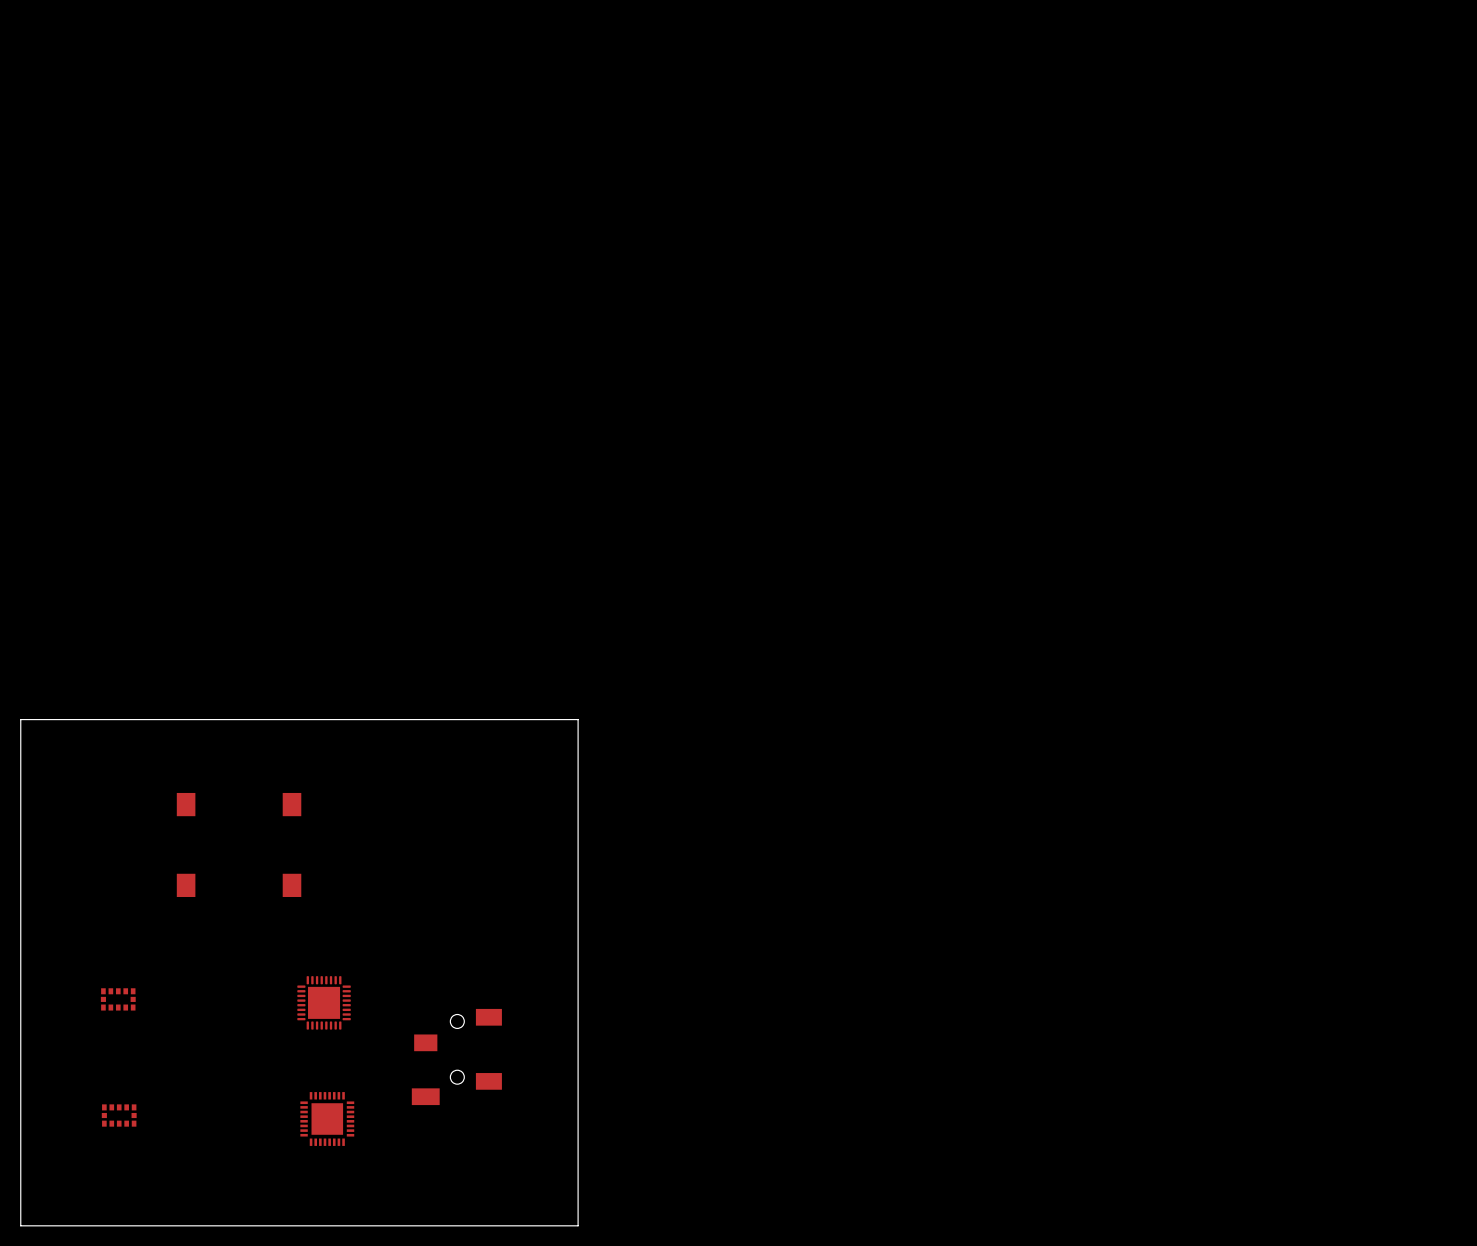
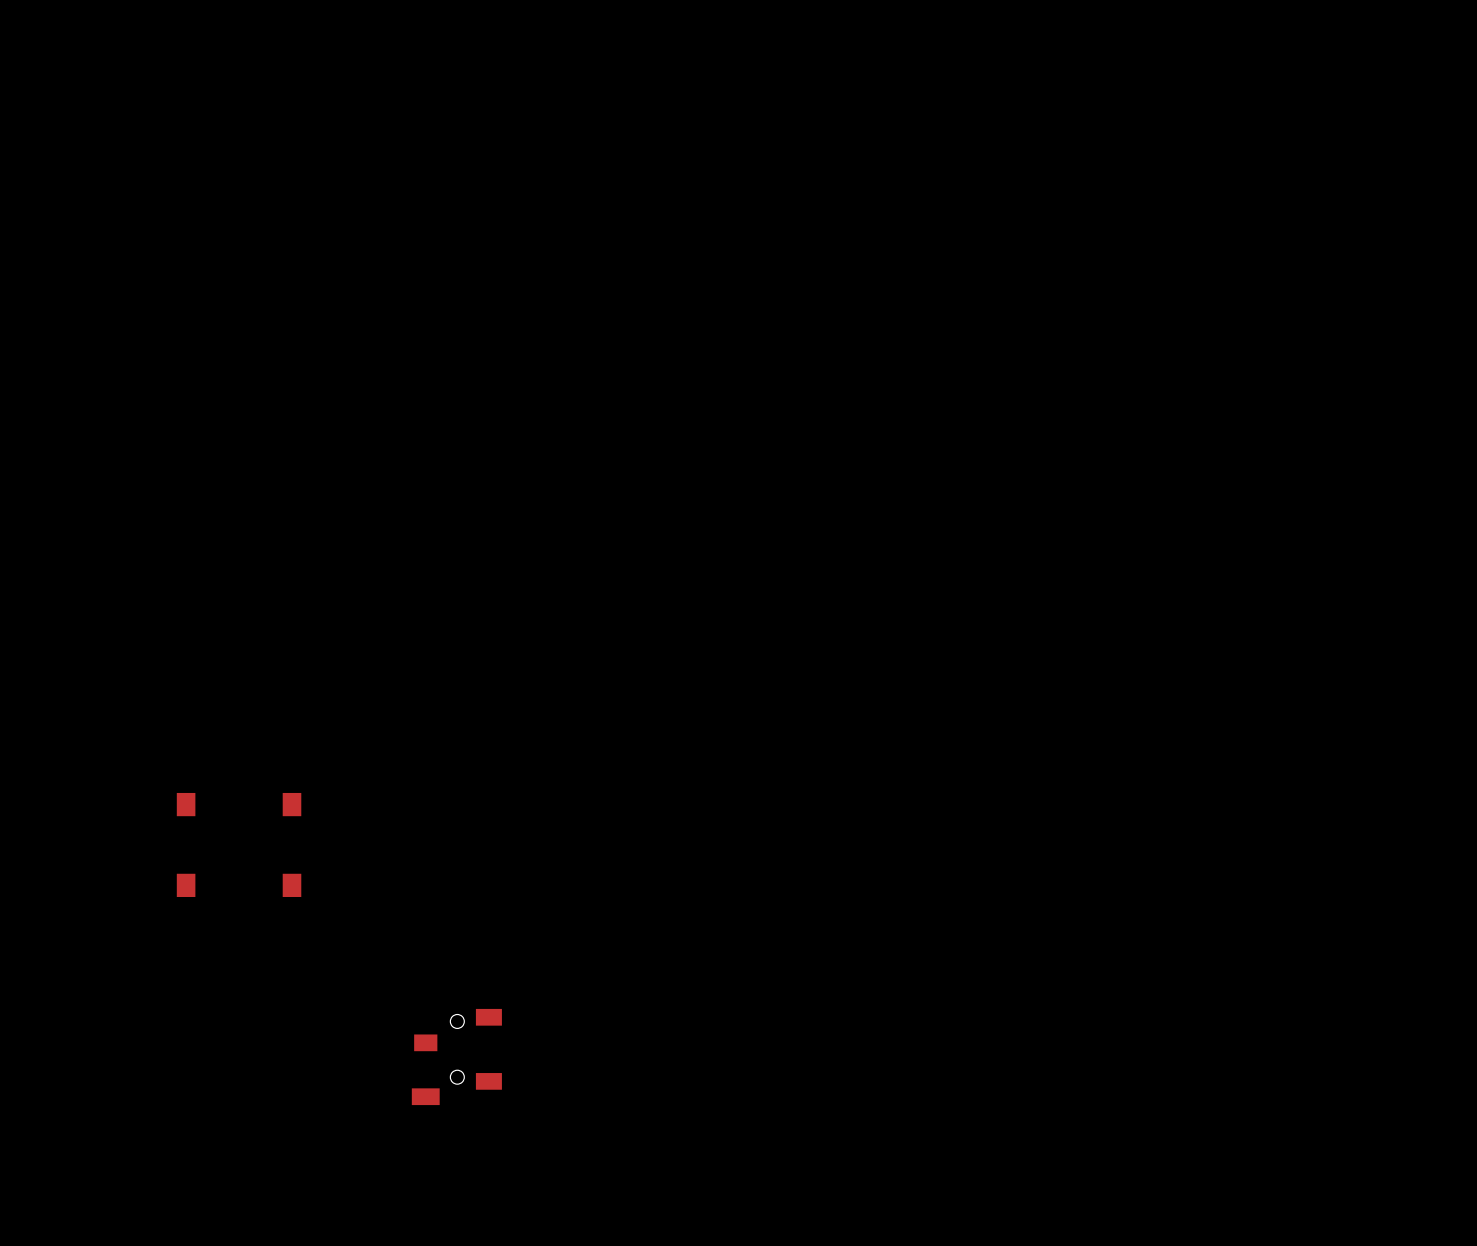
board edge: (578, 719) (20, 719) (20, 1225) (578, 1225) (578, 719) -> none
part: (118, 999) -> none
part: (324, 1002) -> none
part: (119, 1115) -> none
part: (327, 1119) -> none

